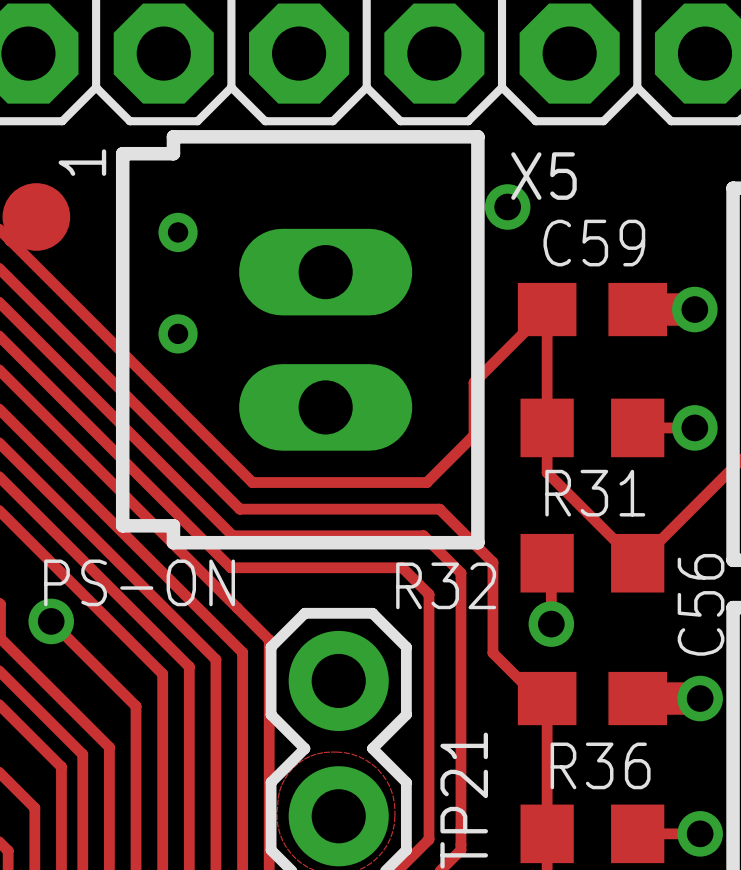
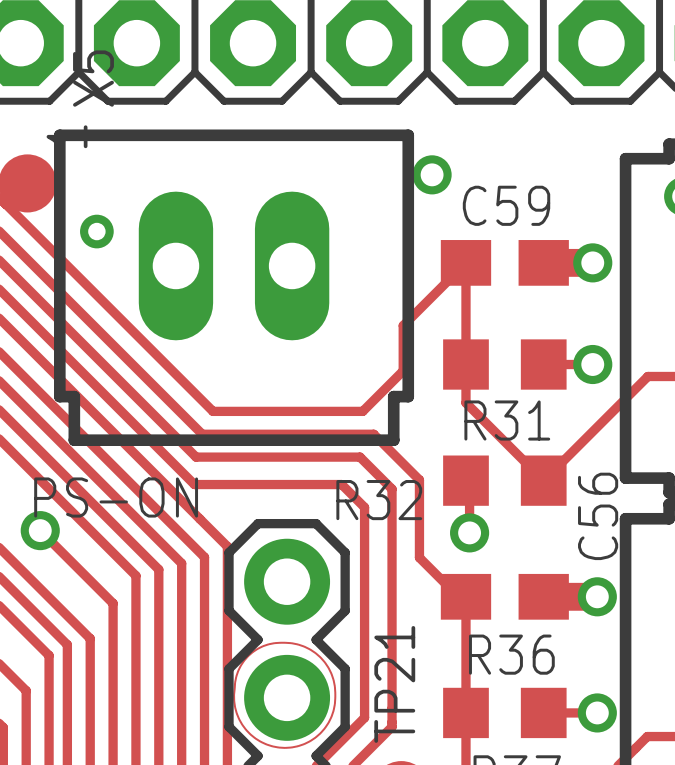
via: (178, 232) -> none
via: none -> (96, 231)
via: (178, 333) -> none
X5 rotation: 0° (300, 339) -> 90° counterclockwise (234, 287)

